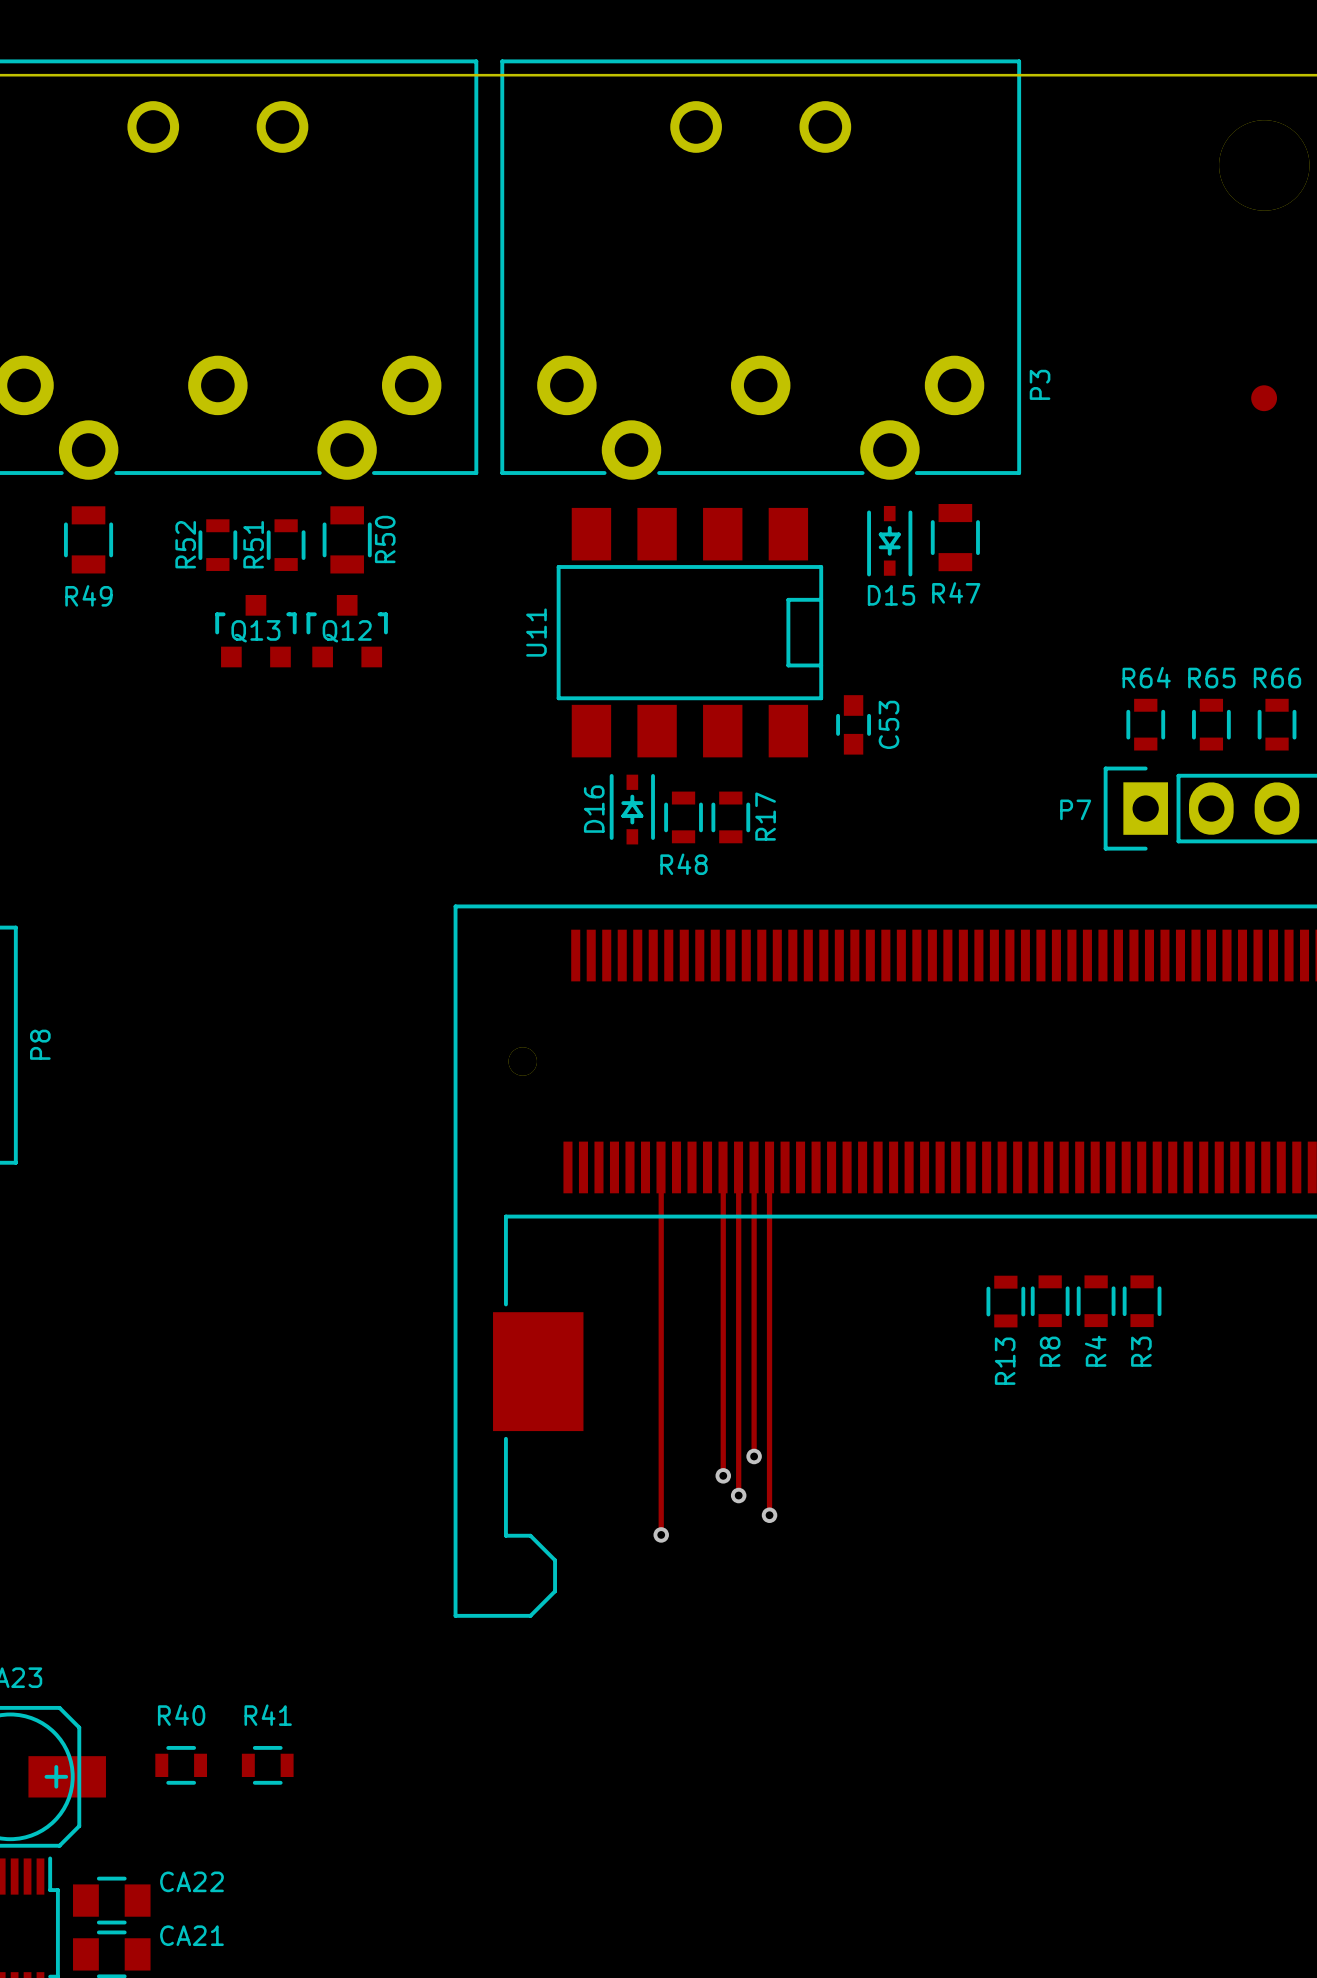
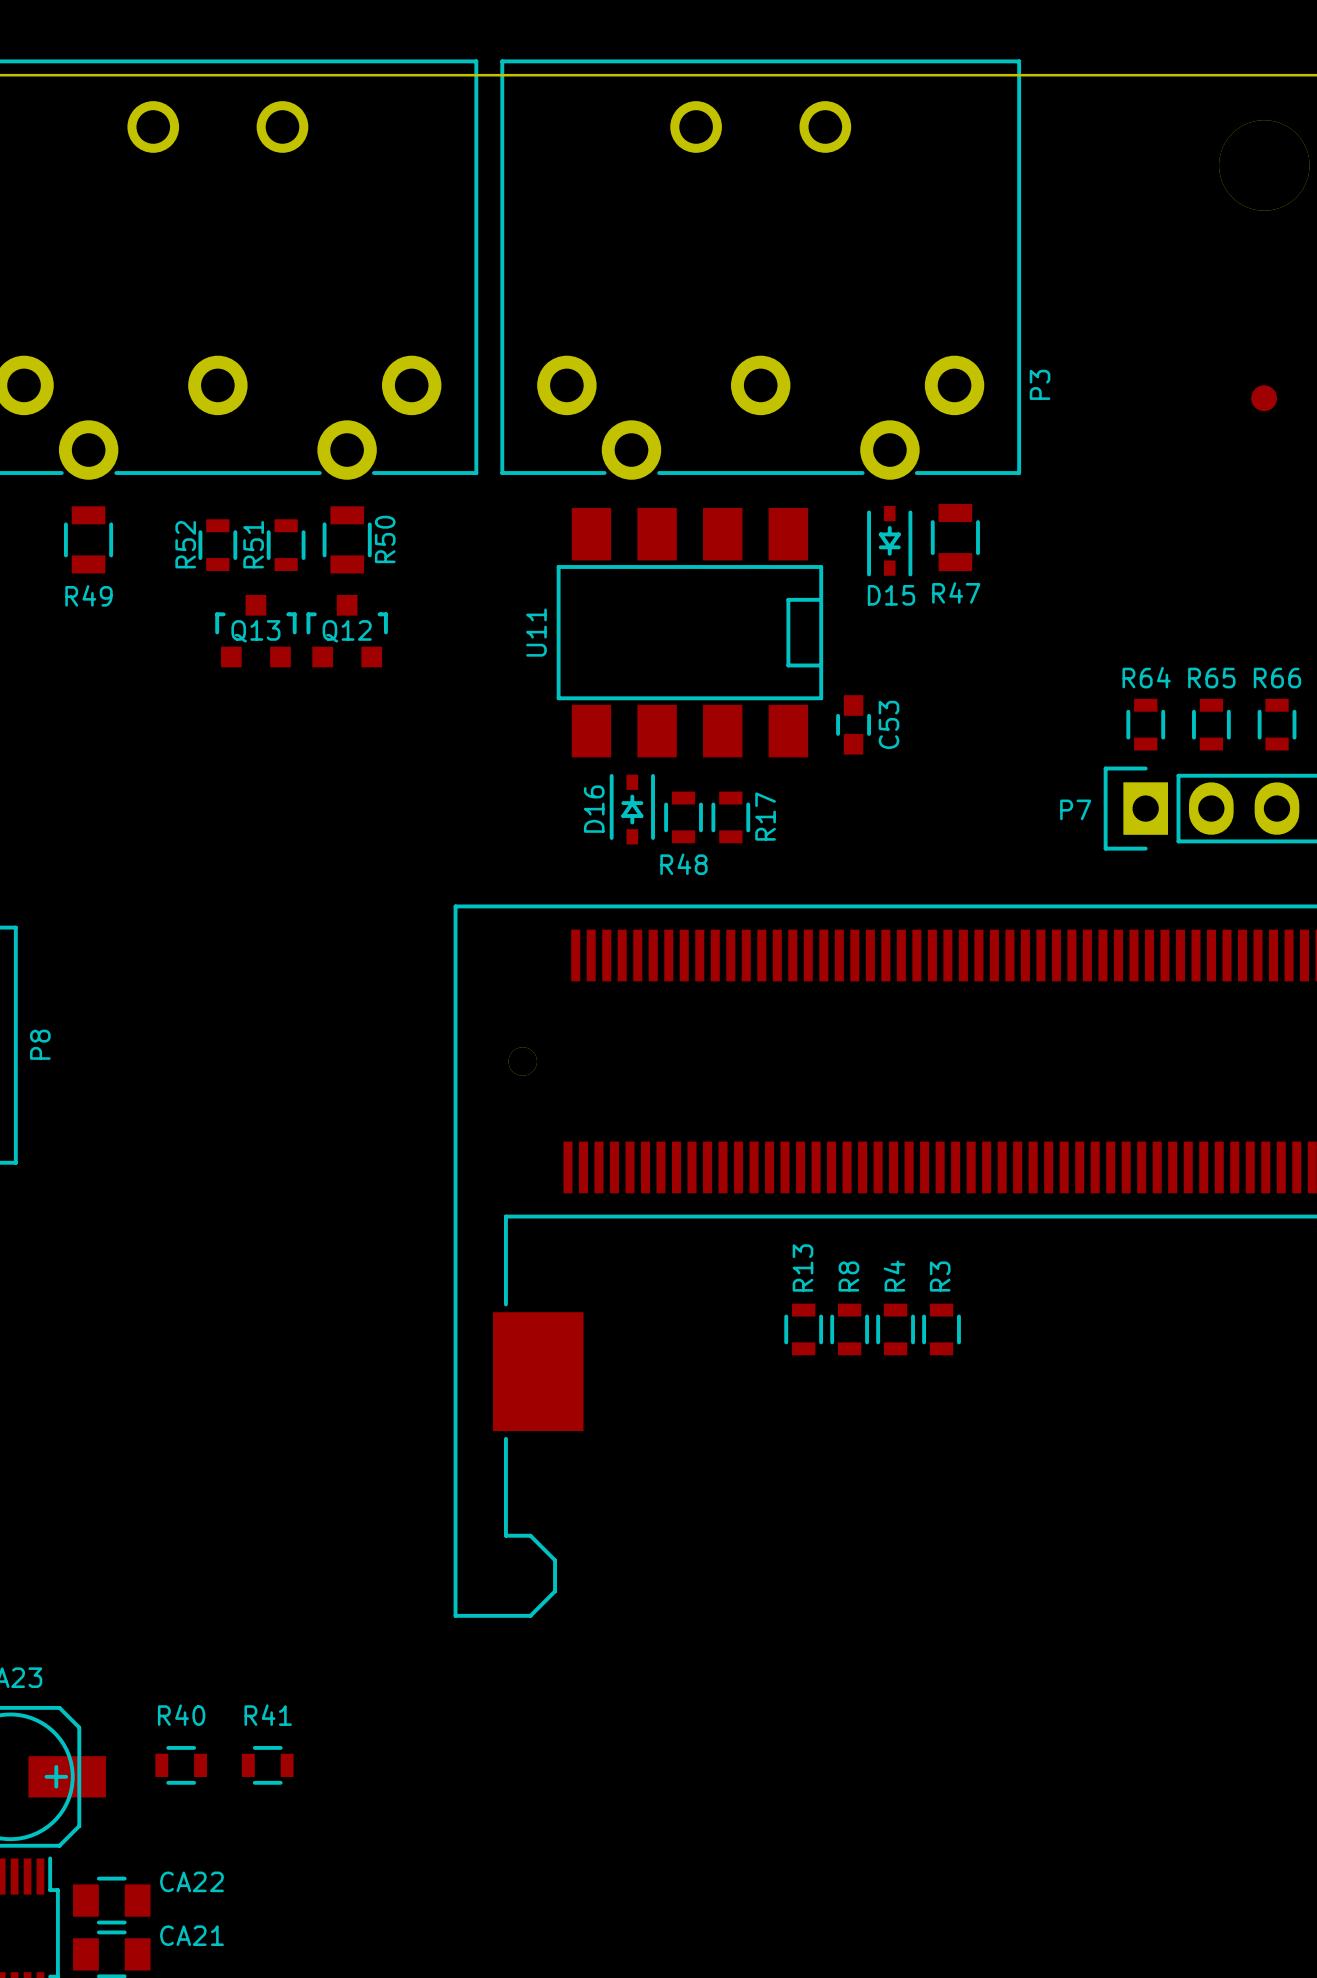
track: (661, 1167) (661, 1534) -> none
track: (723, 1167) (723, 1475) -> none
track: (738, 1167) (738, 1495) -> none
track: (754, 1167) (754, 1456) -> none
track: (769, 1167) (769, 1515) -> none
R13 position: (1005, 1301) -> (803, 1329)
R8 position: (1050, 1301) -> (849, 1329)
R4 position: (1096, 1301) -> (895, 1329)
R3 position: (1142, 1301) -> (941, 1329)
R8 name position: R8 (1050, 1351) -> R8 (848, 1276)
R4 name position: R4 (1095, 1351) -> R4 (894, 1276)
R3 name position: R3 (1141, 1351) -> R3 (940, 1276)
R13 name position: R13 (1005, 1361) -> R13 (803, 1267)
via: (754, 1456) -> none
via: (723, 1475) -> none
via: (738, 1495) -> none
via: (769, 1515) -> none
via: (661, 1534) -> none

